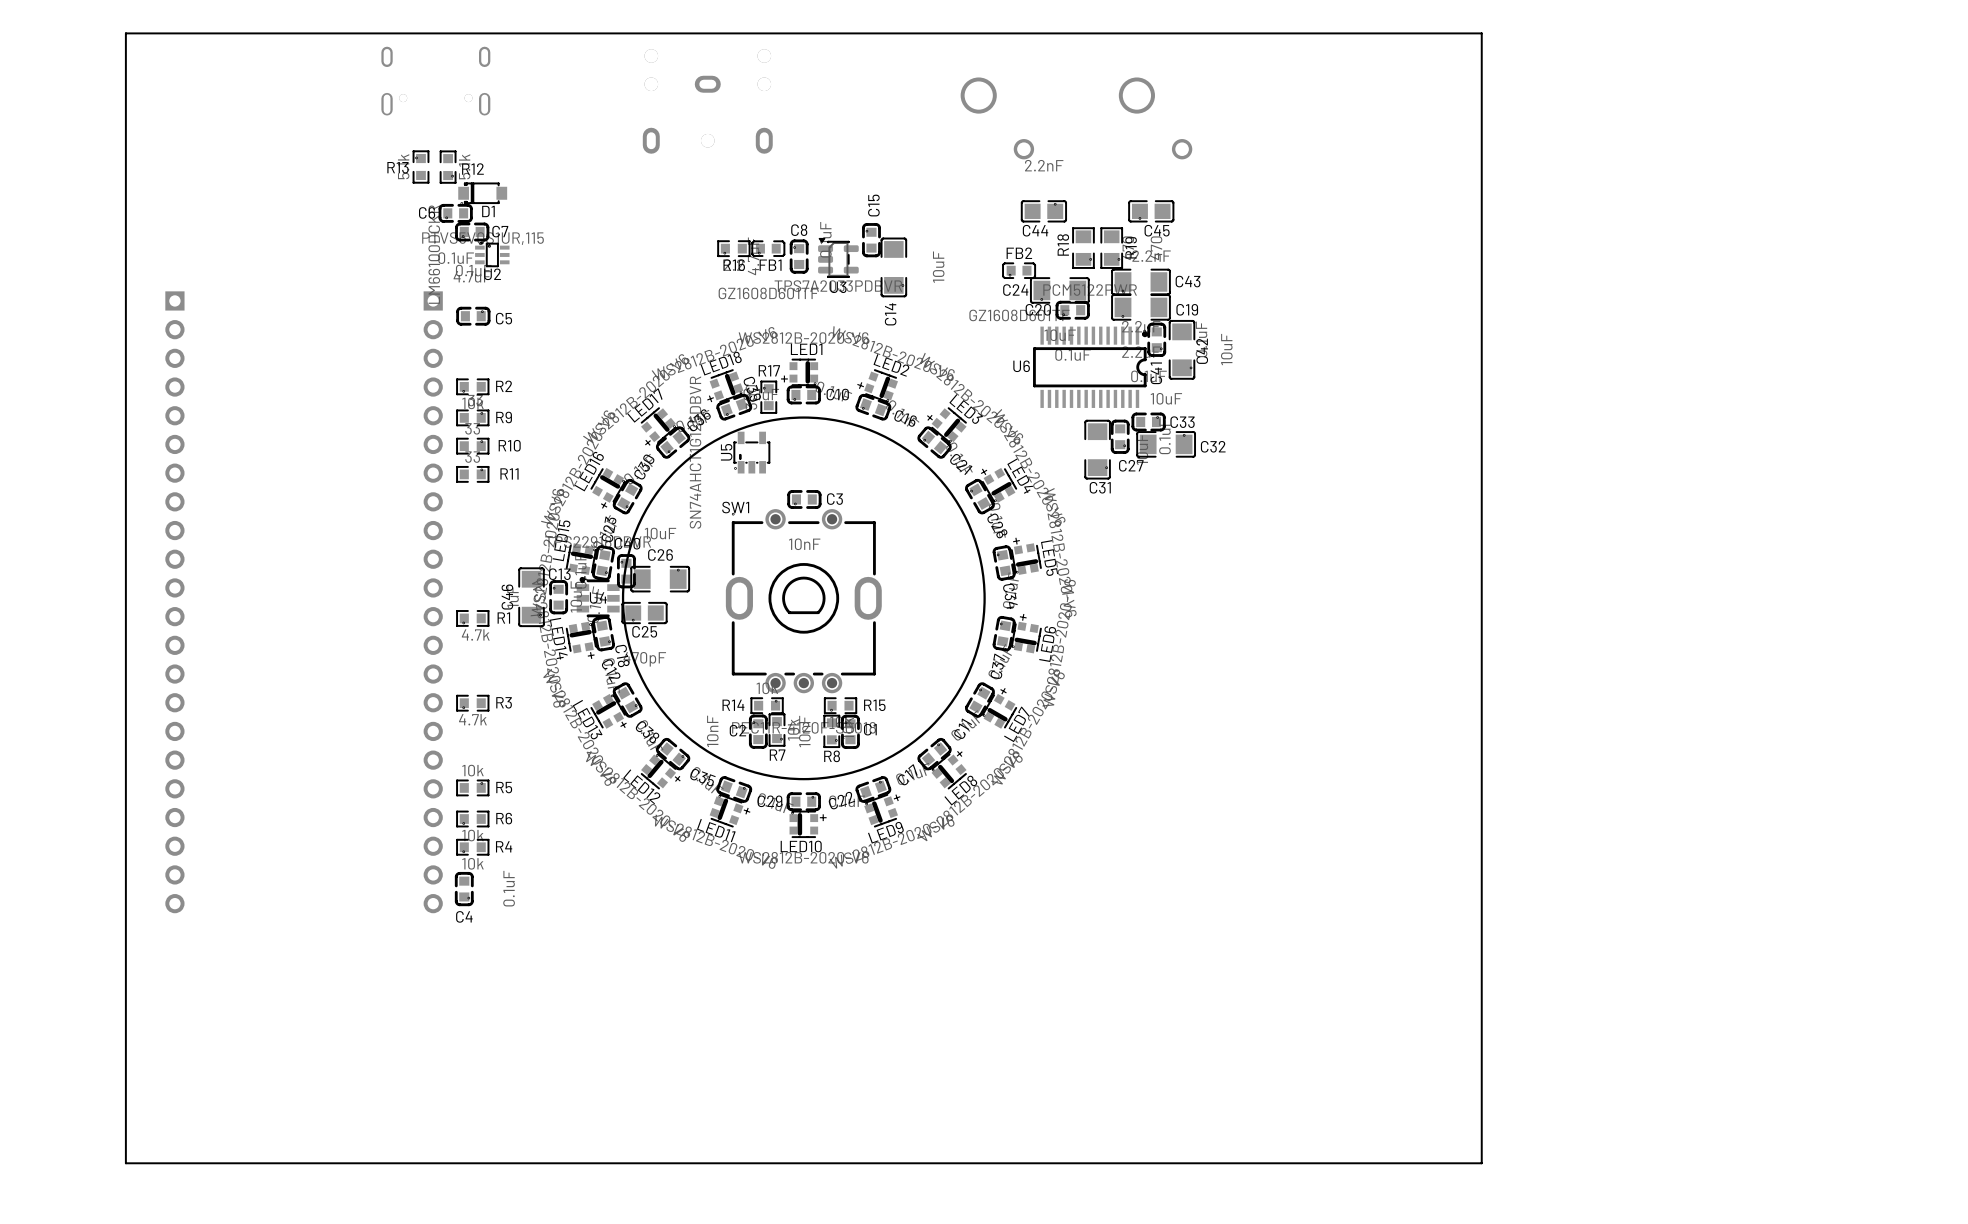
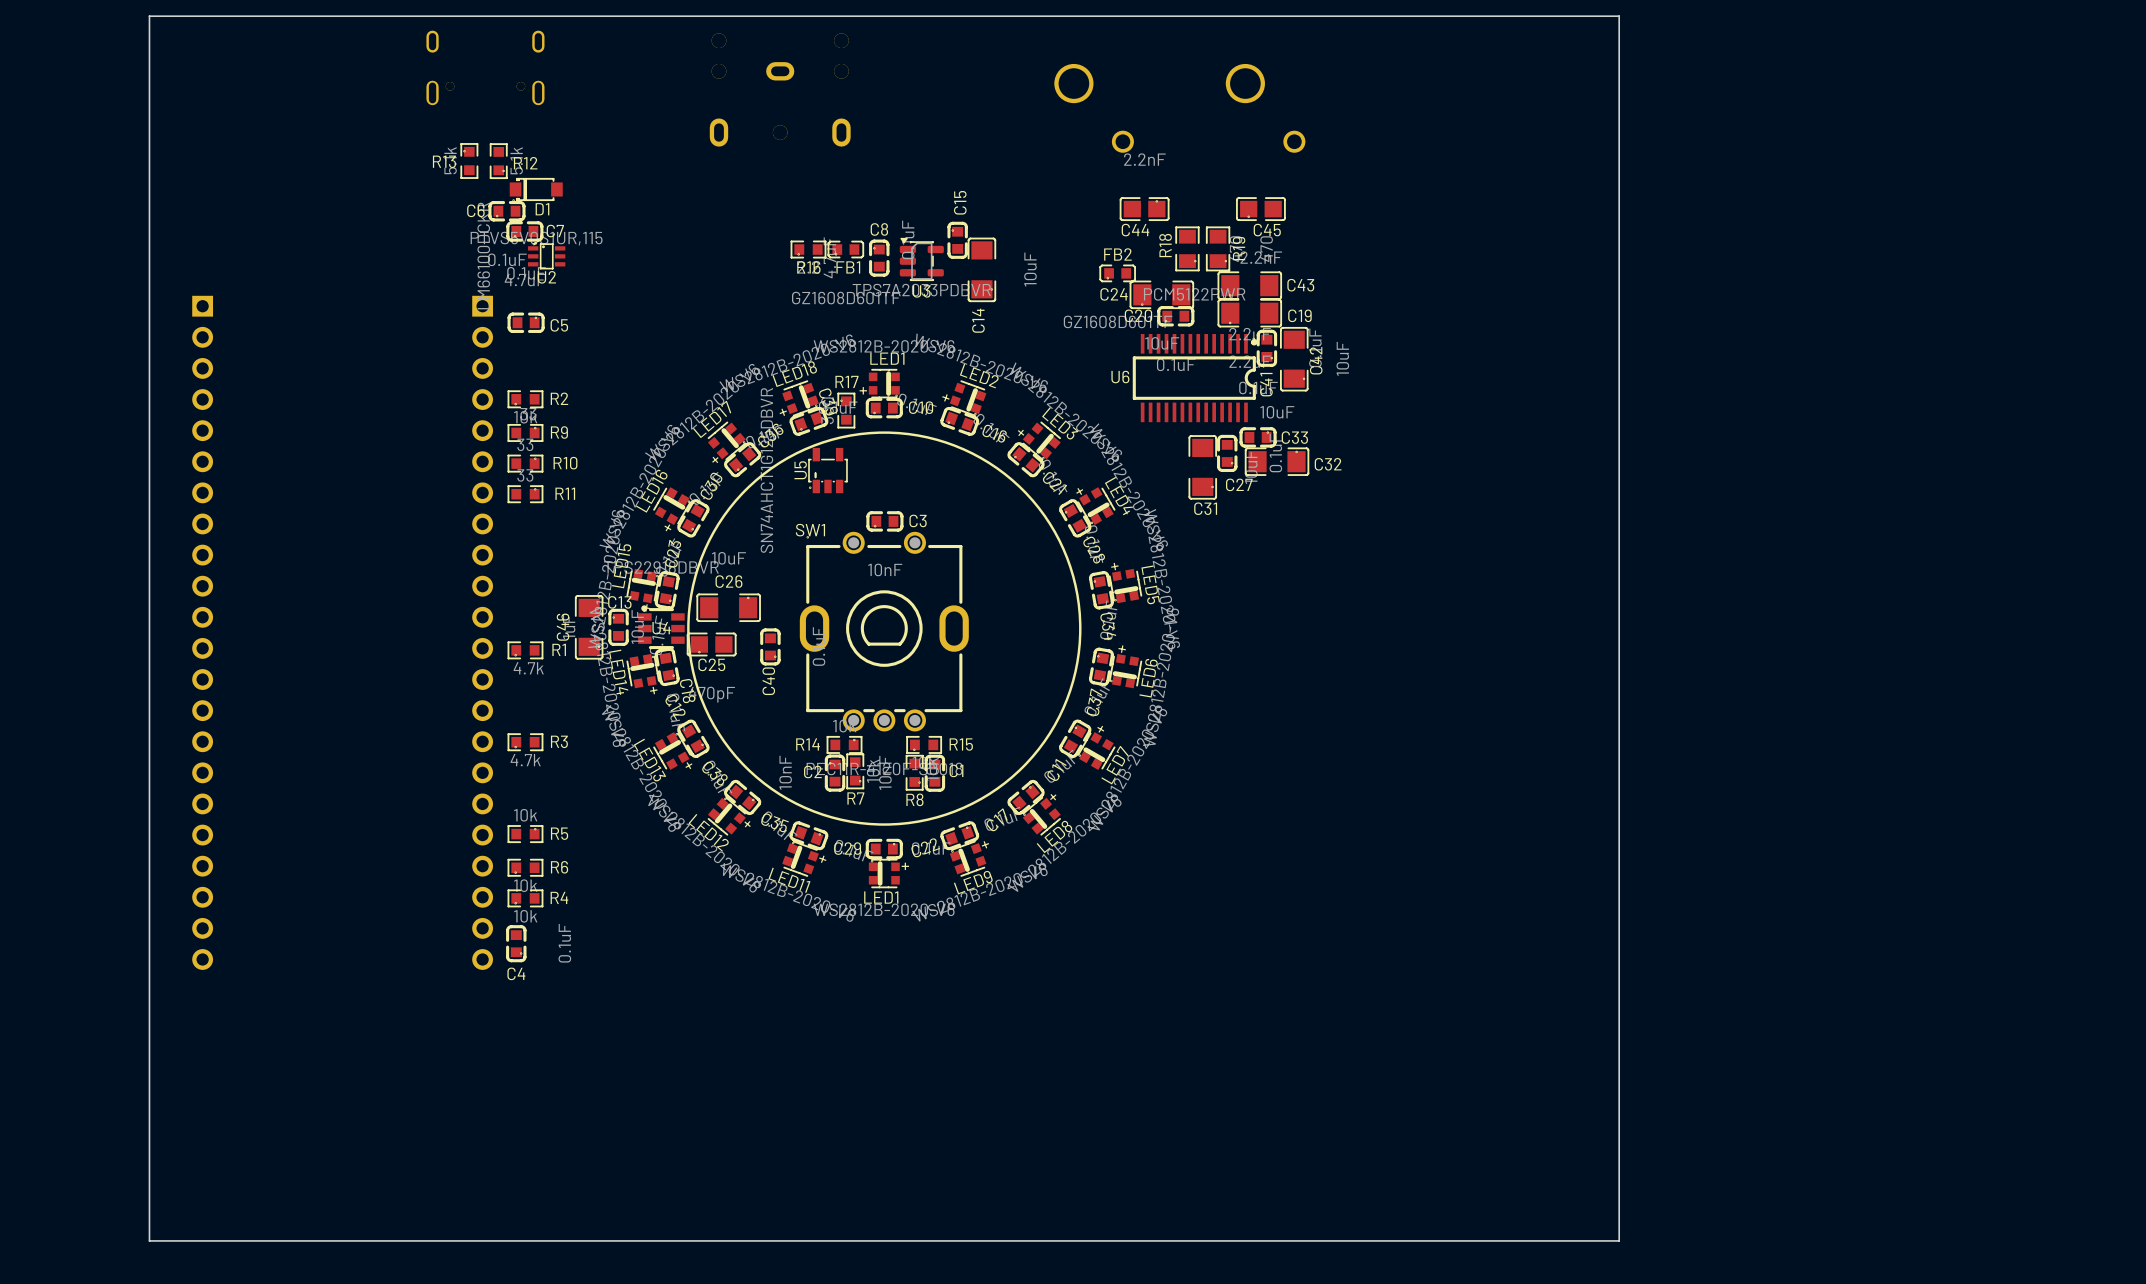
C40 rotation: 0° (626, 571) -> 180° (770, 646)
C40 position: (626, 571) -> (770, 646)
LED10 name: LED10 (801, 846) -> LED1 (881, 897)

